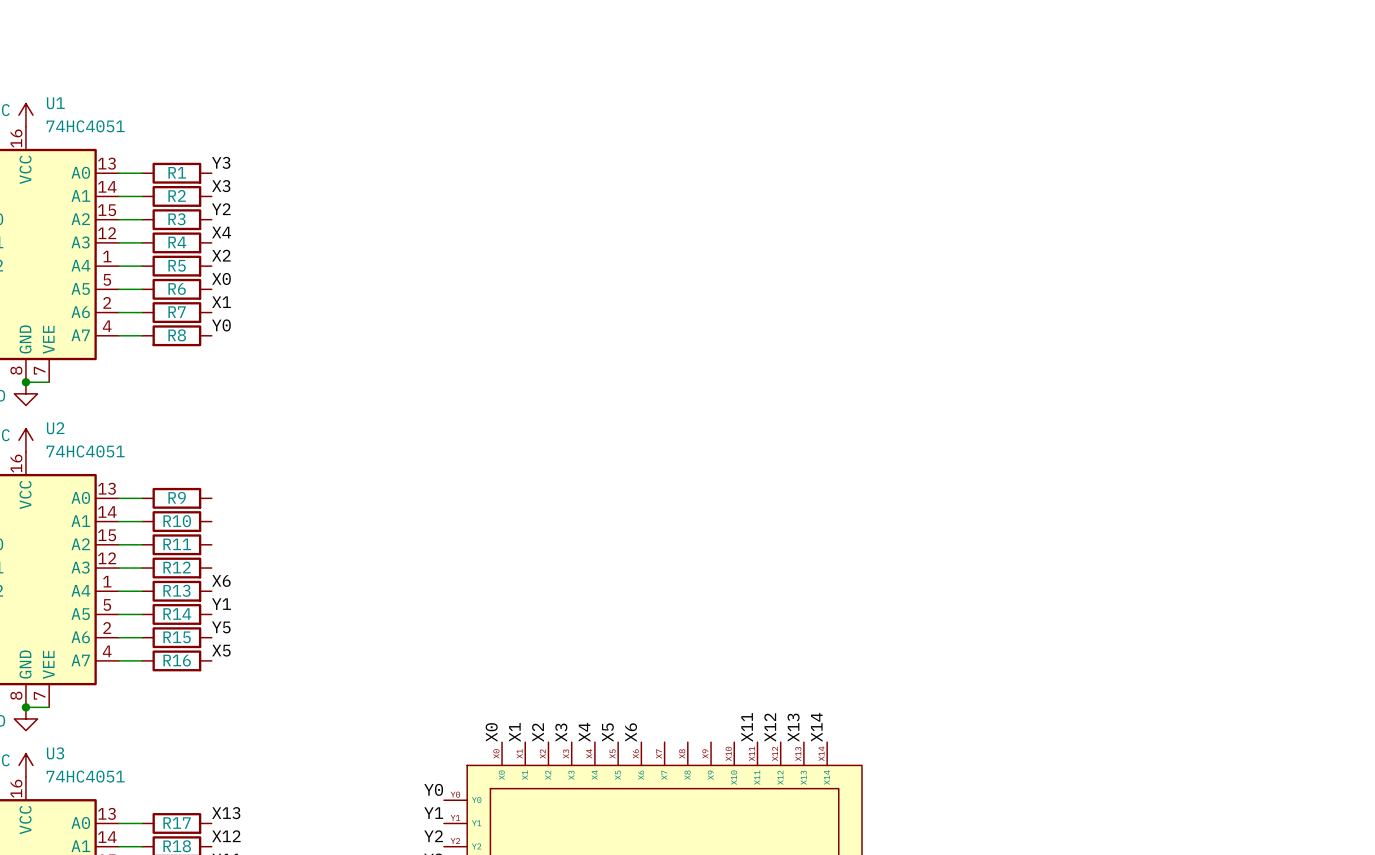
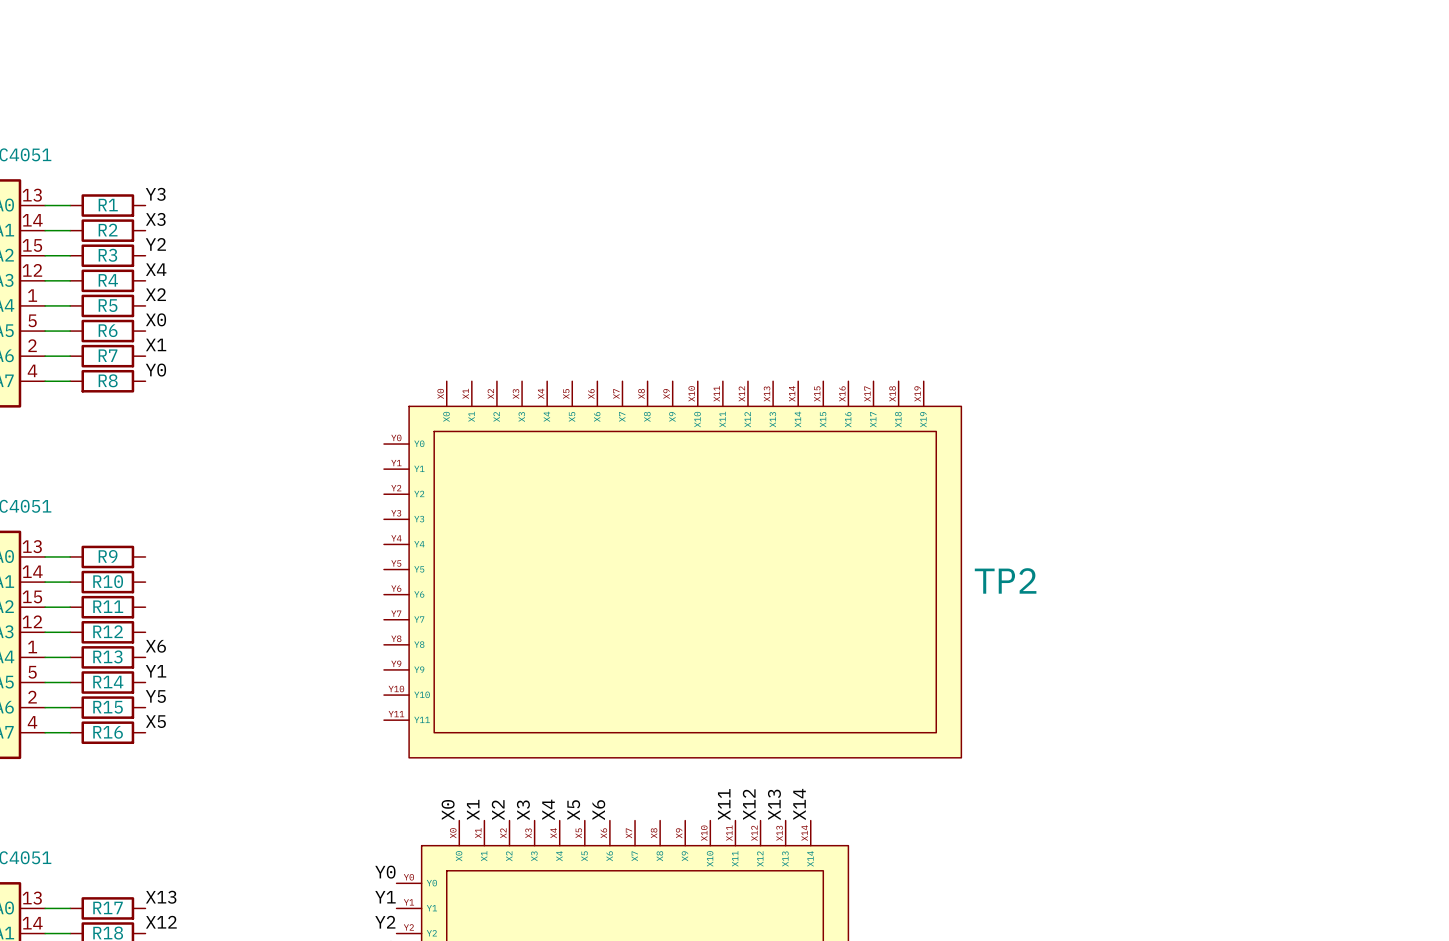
TP2: none -> (672, 569)

